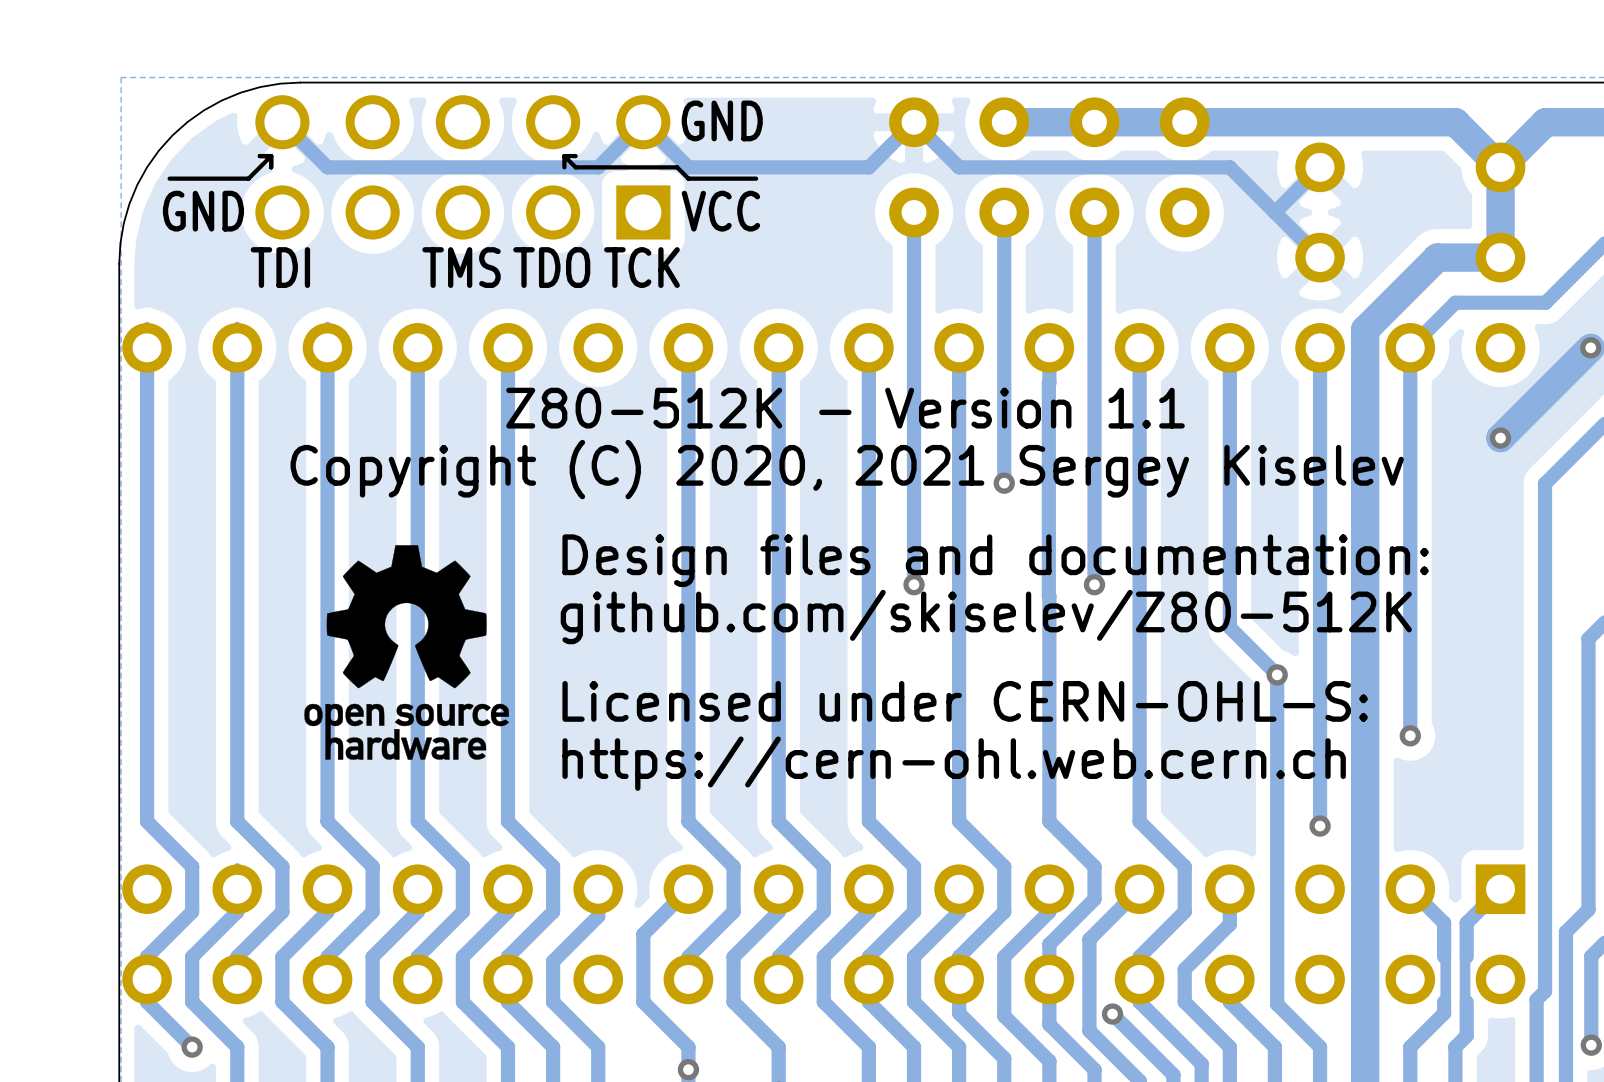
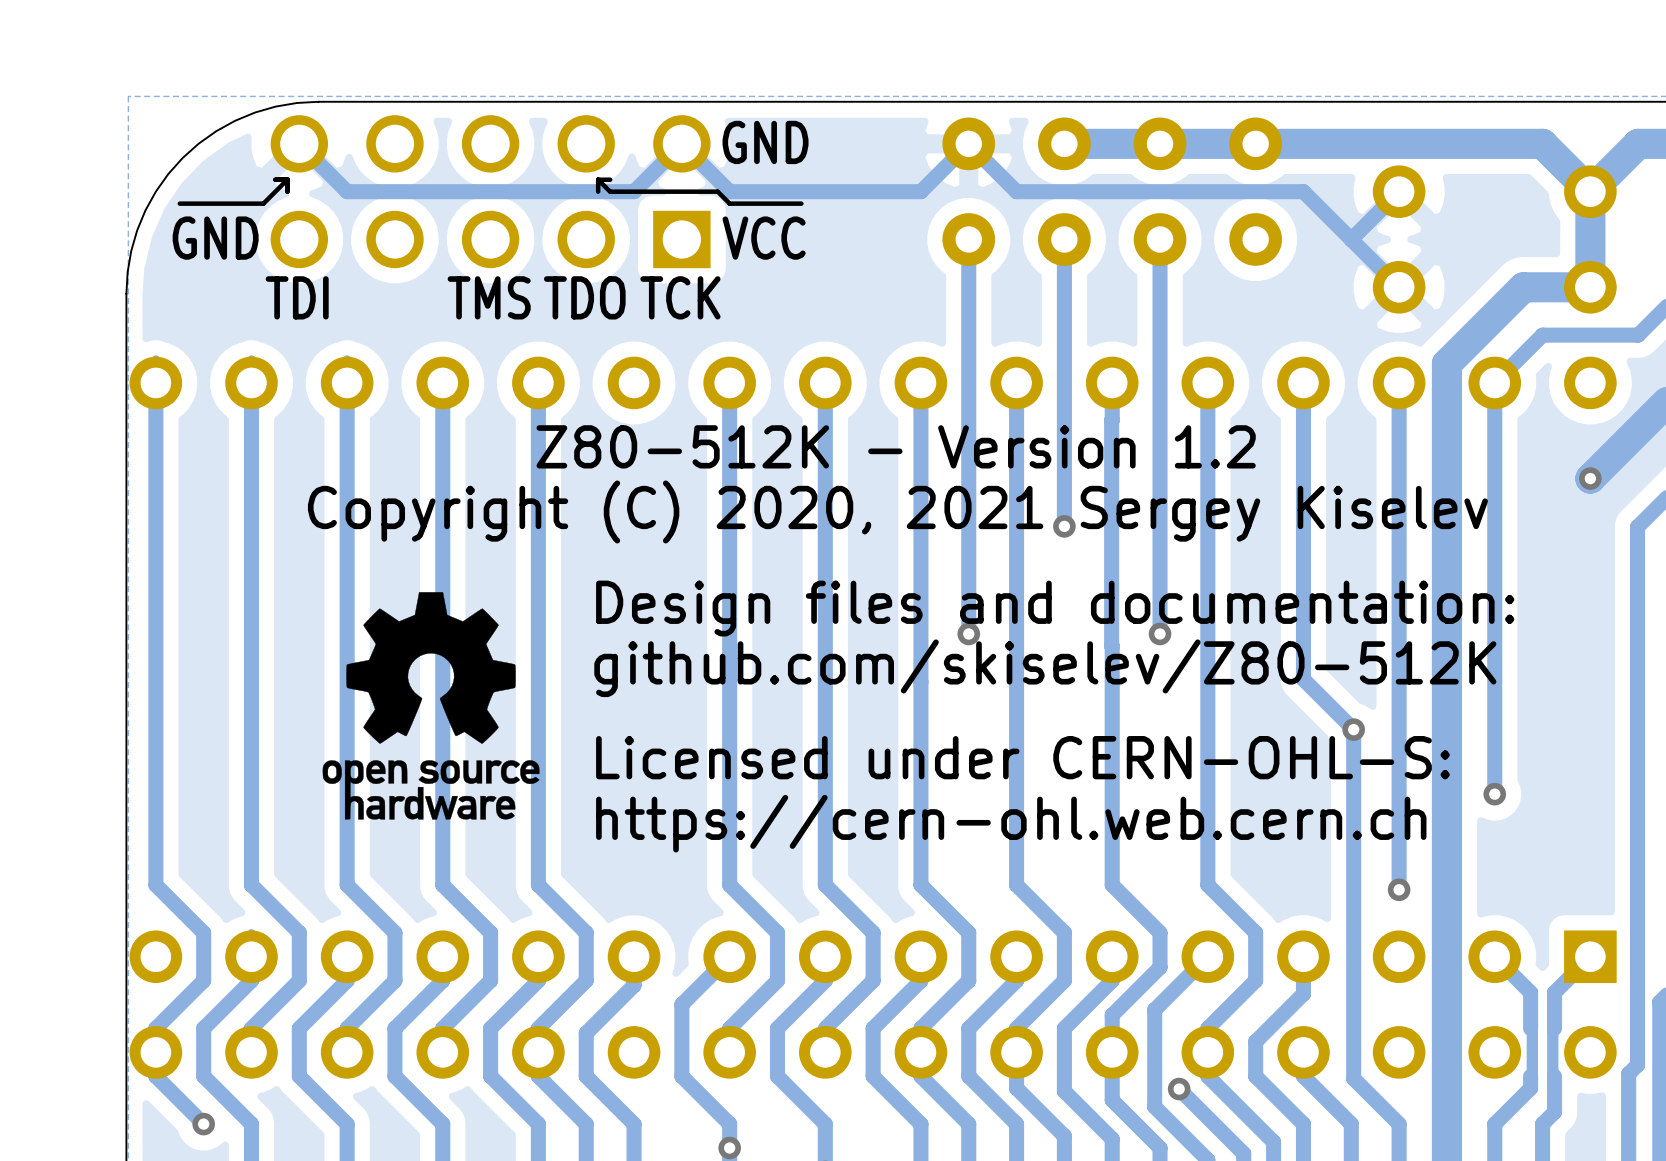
text: Z80-512K - Version 1.1 (845, 408) -> Z80-512K - Version 1.2 (896, 446)

